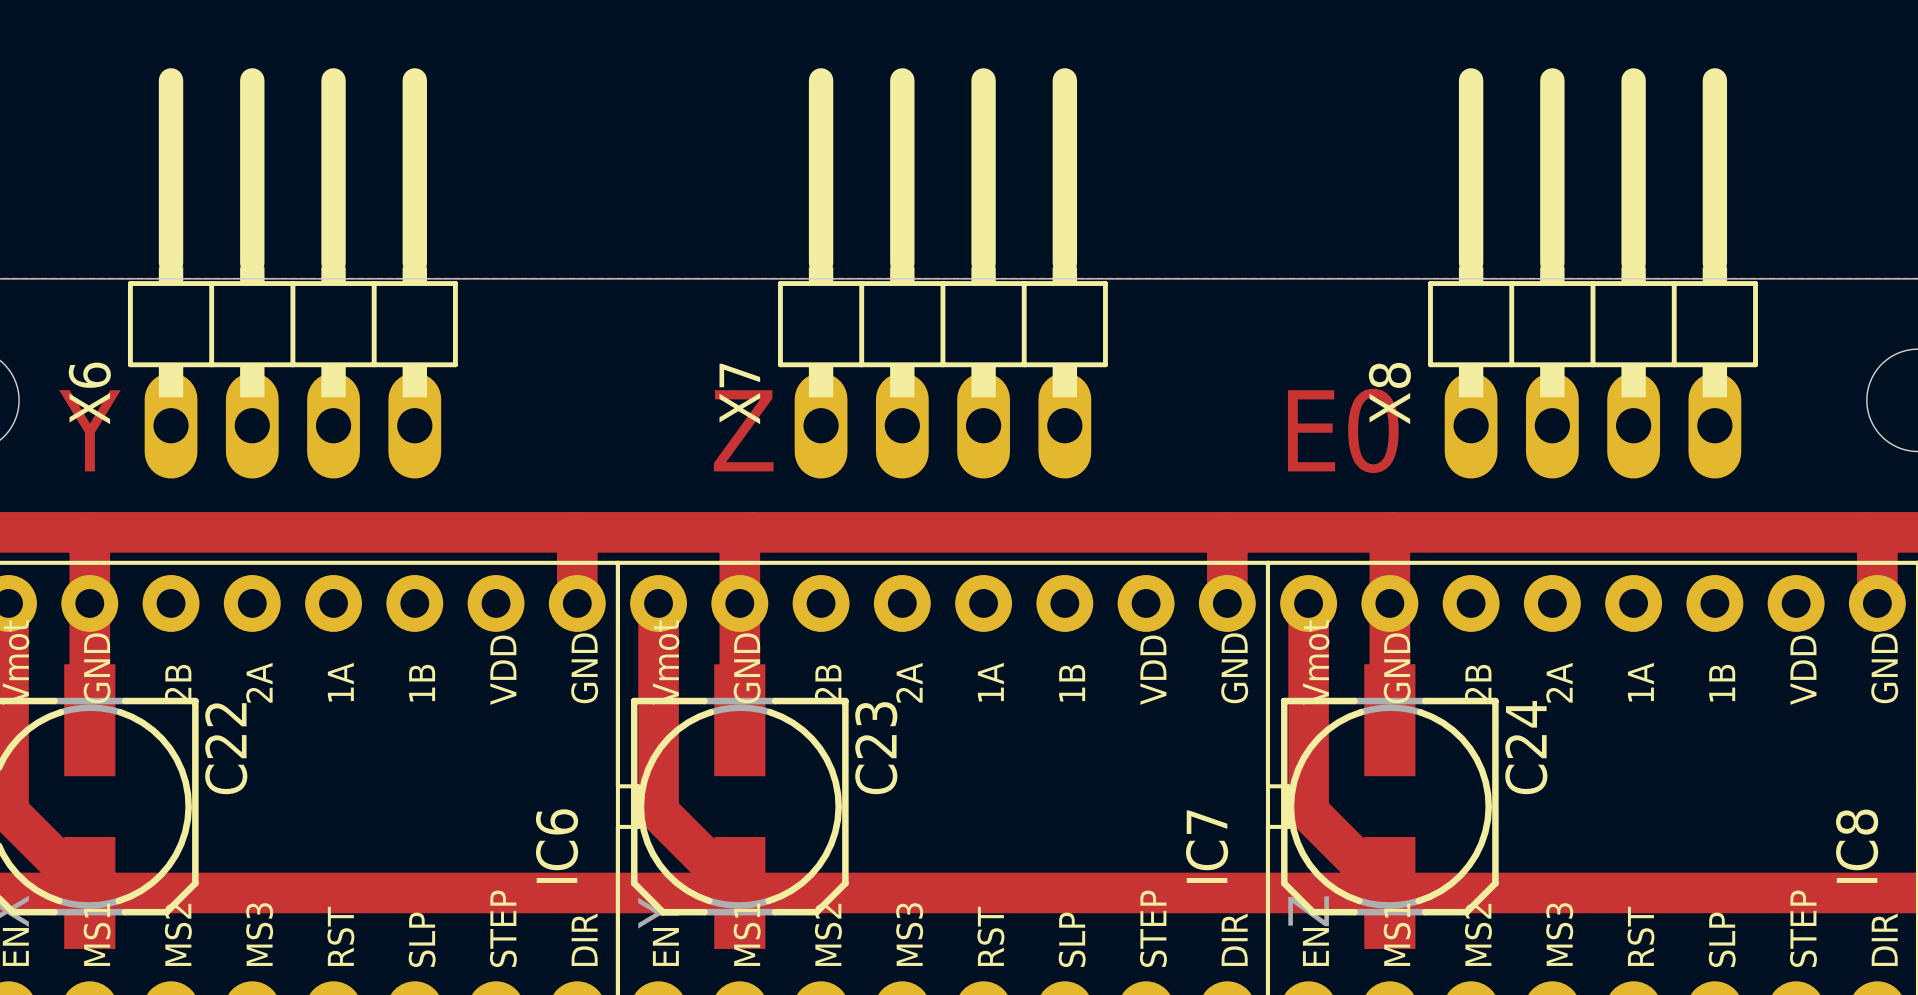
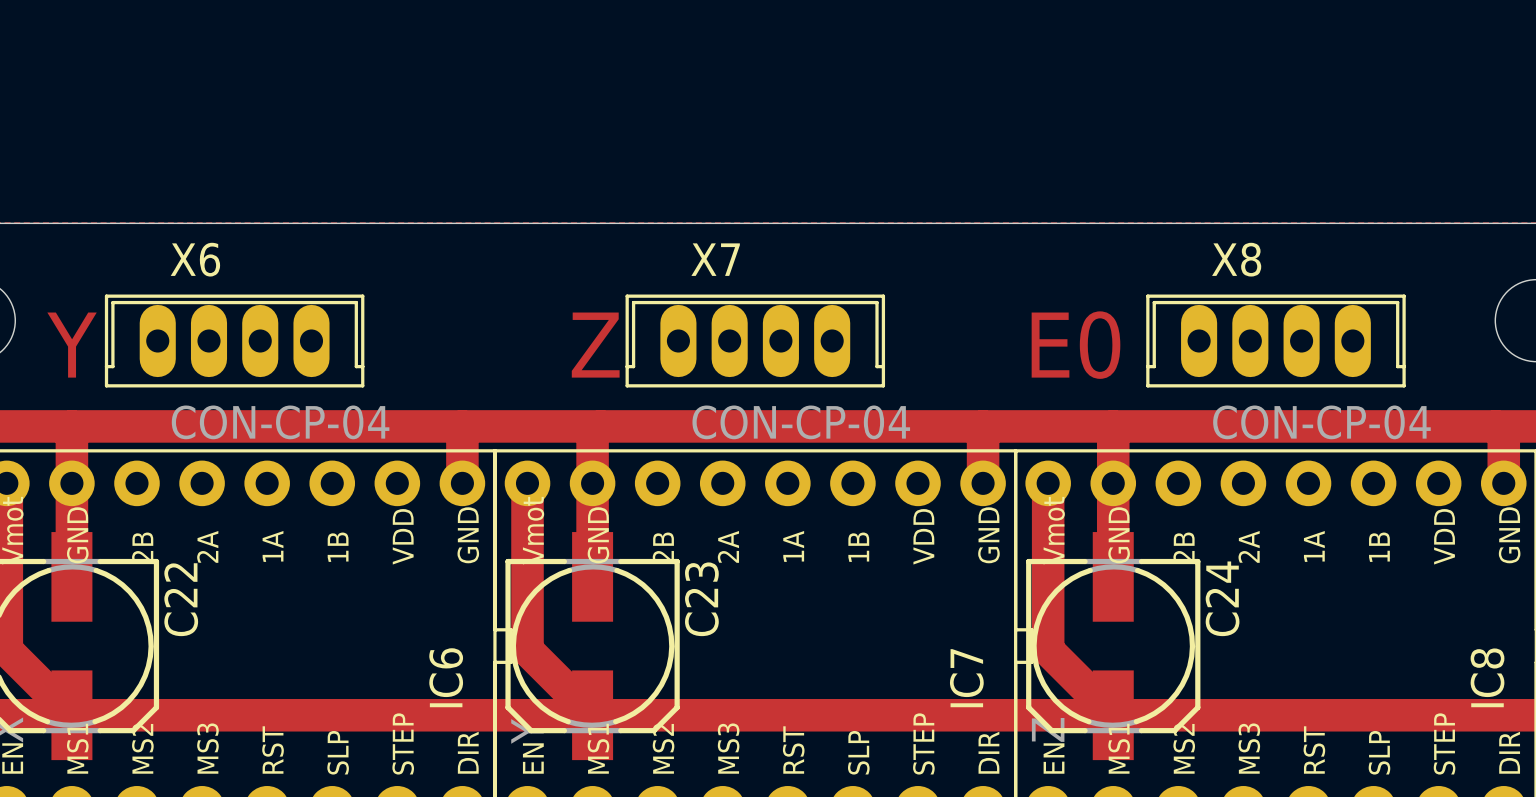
X6 footprint: [127, 68, 458, 479] -> [104, 294, 365, 388]
X7 footprint: [778, 68, 1108, 479] -> [625, 294, 886, 388]
X8 footprint: [1428, 68, 1758, 479] -> [1146, 294, 1406, 388]
X6 name position: X6 (89, 393) -> X6 (195, 259)
X7 name position: X7 (739, 393) -> X7 (715, 259)
X8 name position: X8 (1389, 393) -> X8 (1236, 259)
X6 value: none -> CON-CP-04 (280, 422)
X7 value: none -> CON-CP-04 (801, 422)
X8 value: none -> CON-CP-04 (1321, 422)

